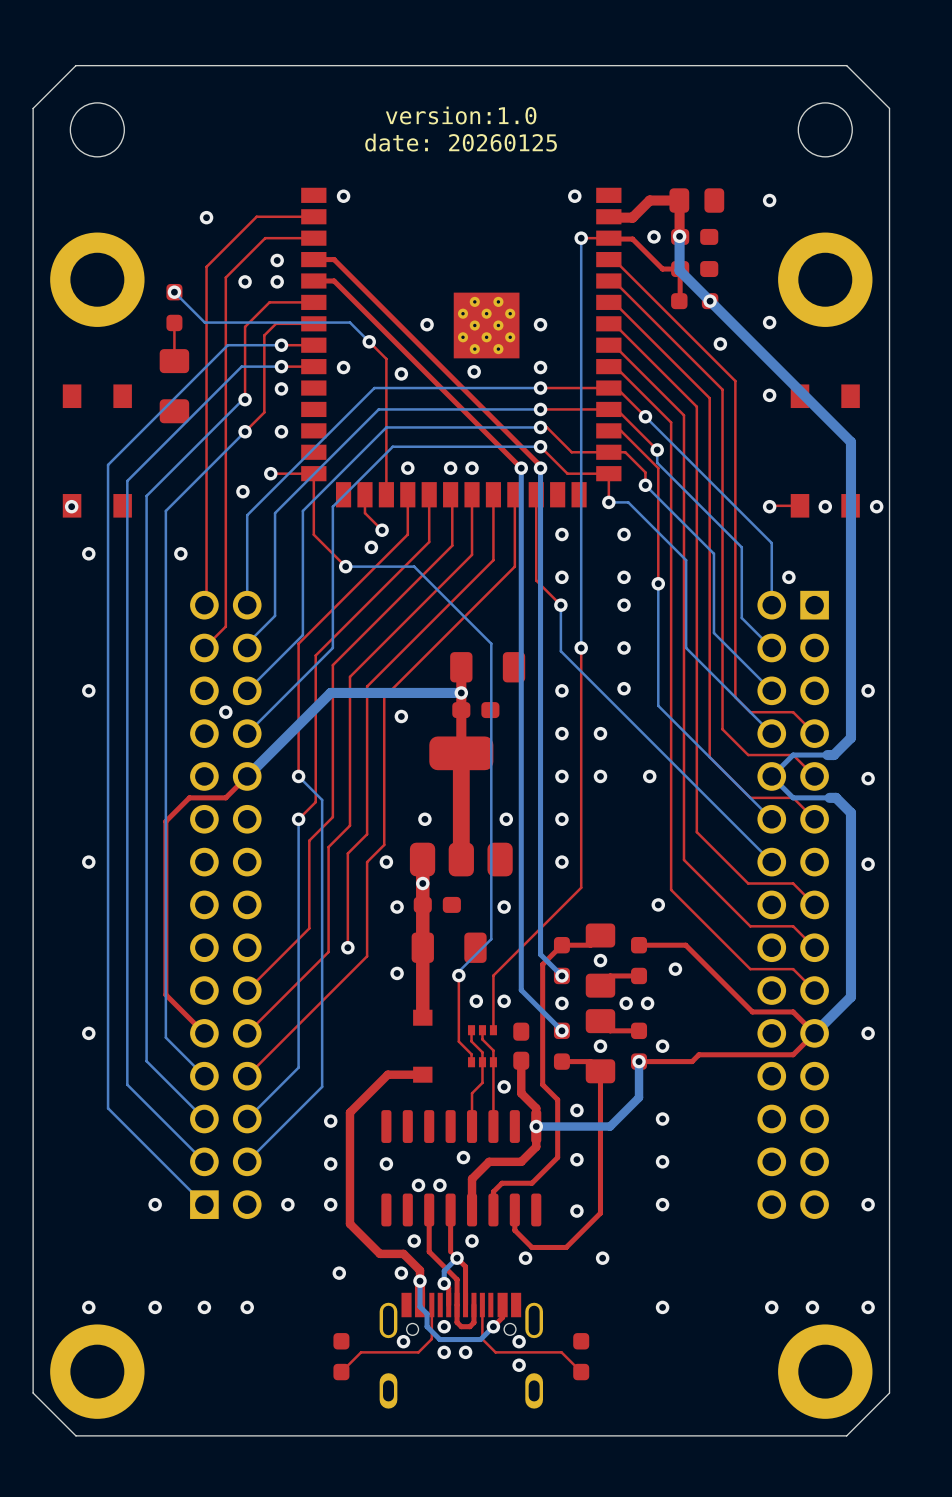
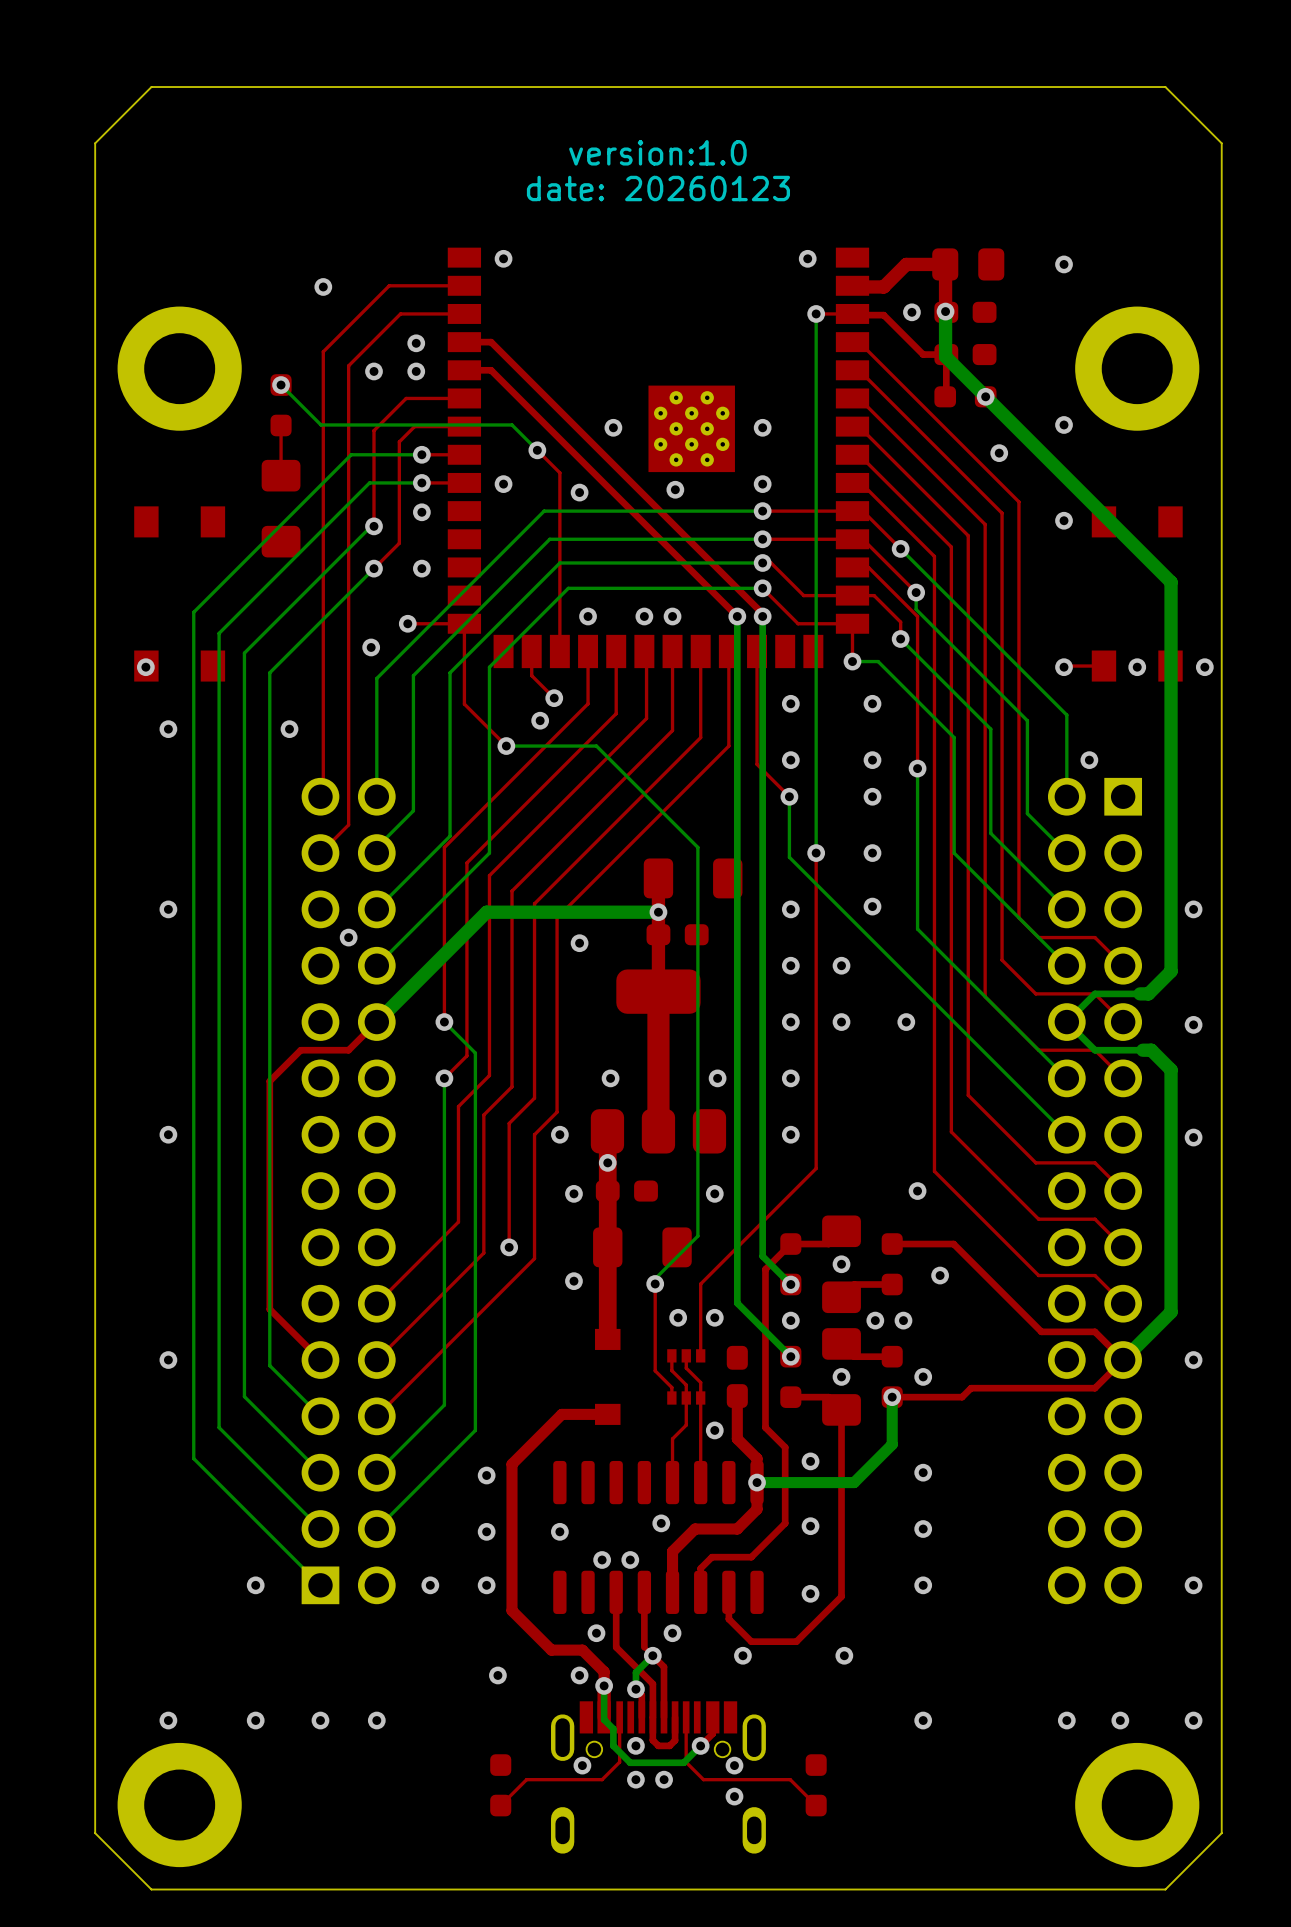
round board edge: [69, 102, 125, 158] -> none
round board edge: [797, 102, 853, 158] -> none
text: date: 20260125 (461, 142) -> date: 20260123 (658, 188)

